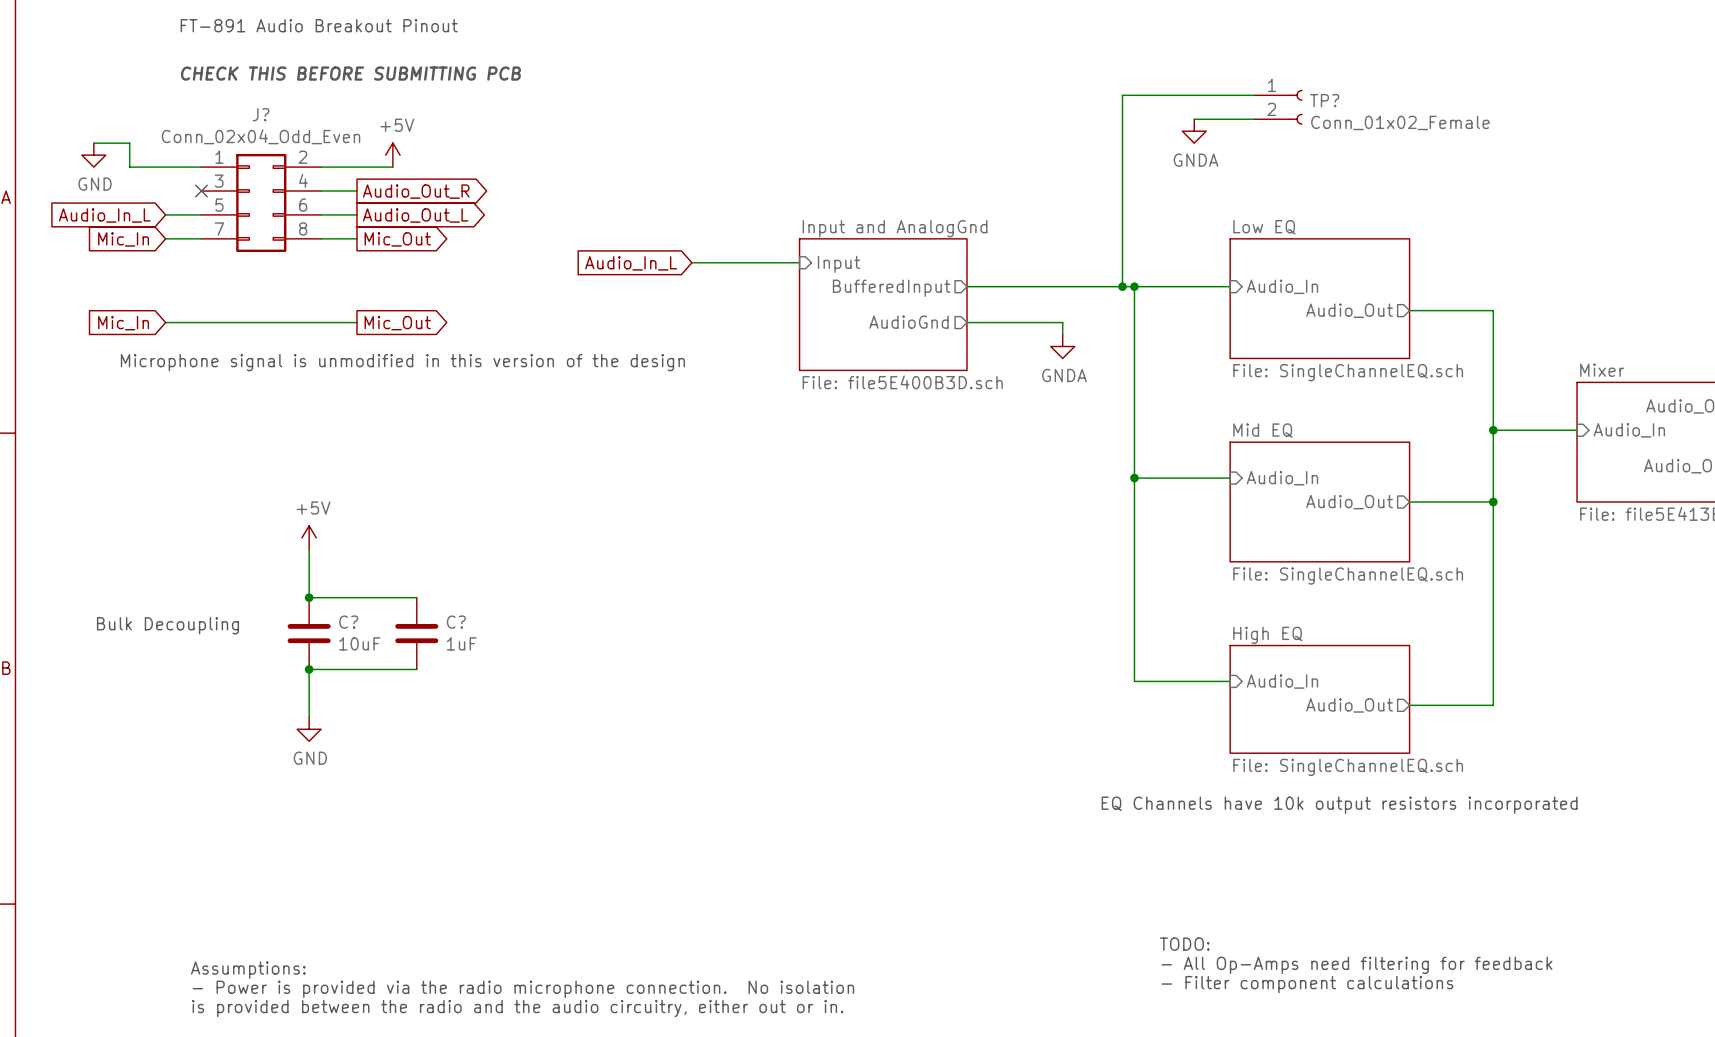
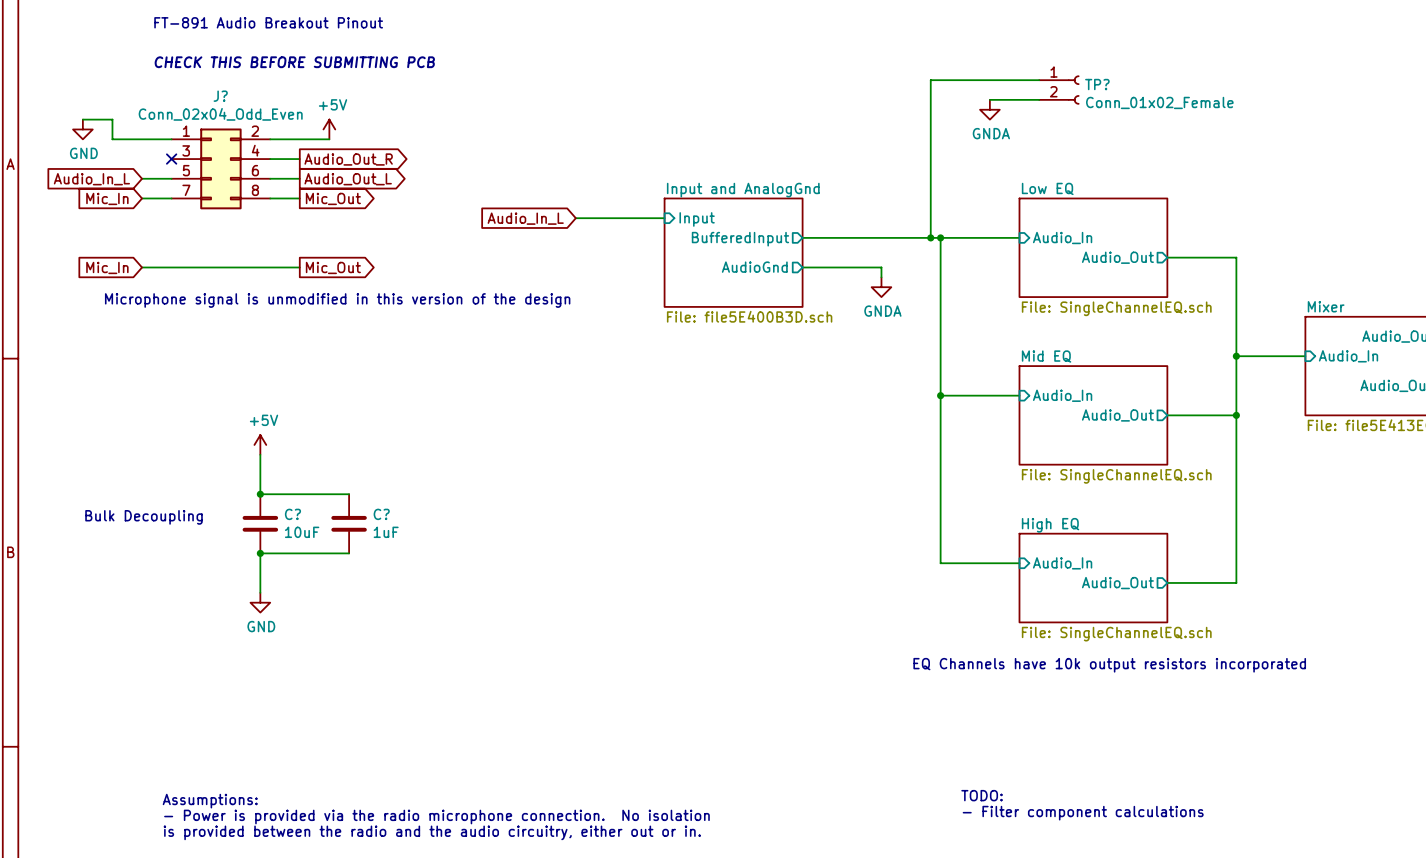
text: TODO: (1184, 944) -> none
text: - All Op-Amps need filtering for feedback (1356, 965) -> TODO: (982, 795)

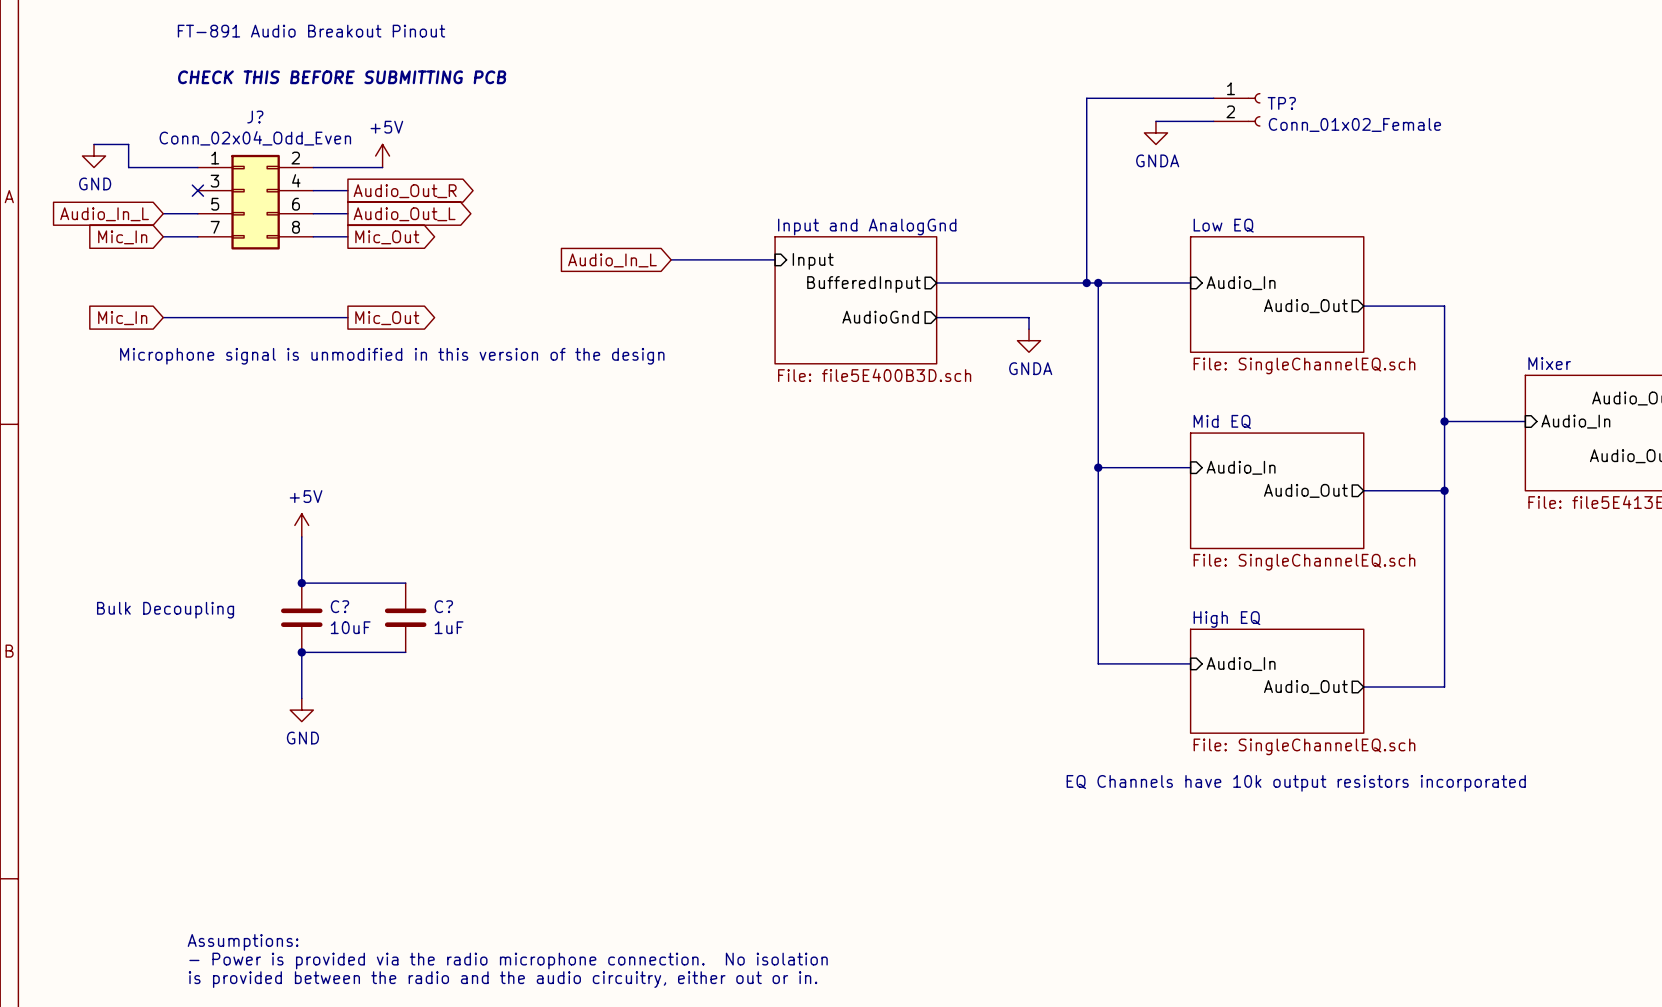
text: TODO: (982, 795) -> none
text: - Filter component calculations (1083, 813) -> none

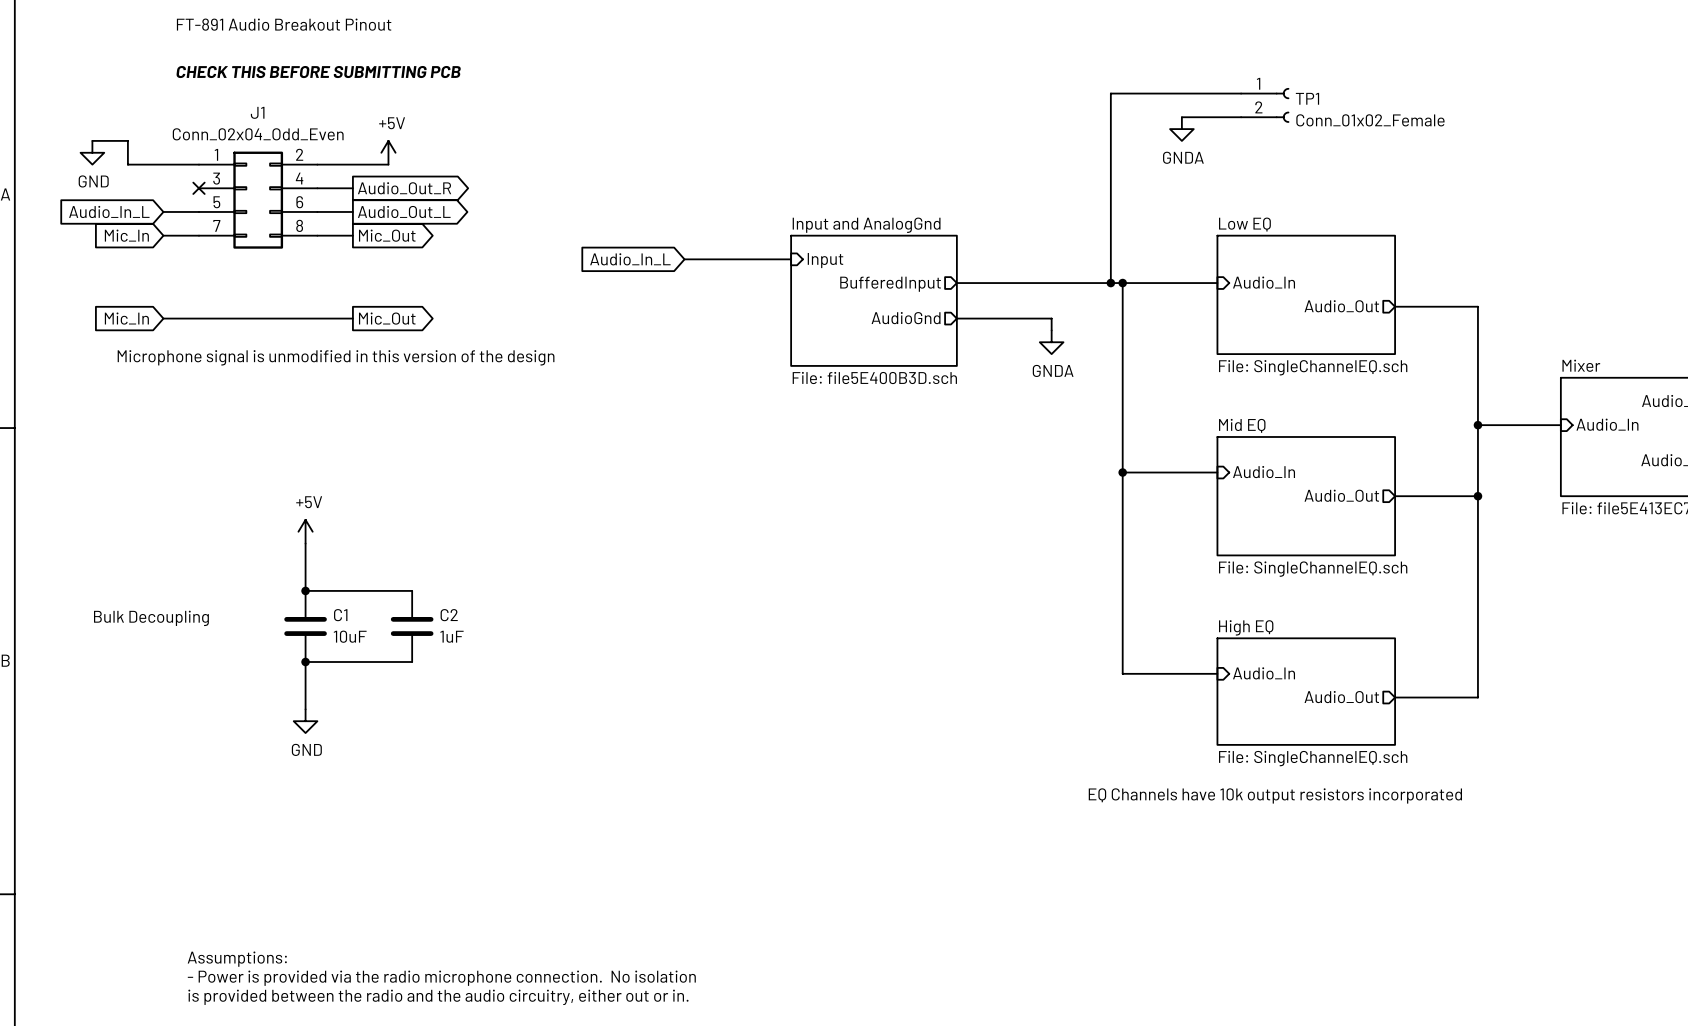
TP? name: TP? (1281, 103) -> TP1 (1307, 98)
J? name: J? (255, 117) -> J1 (257, 112)
C? name: C? (339, 606) -> C1 (340, 615)
C? name: C? (443, 606) -> C2 (449, 615)

